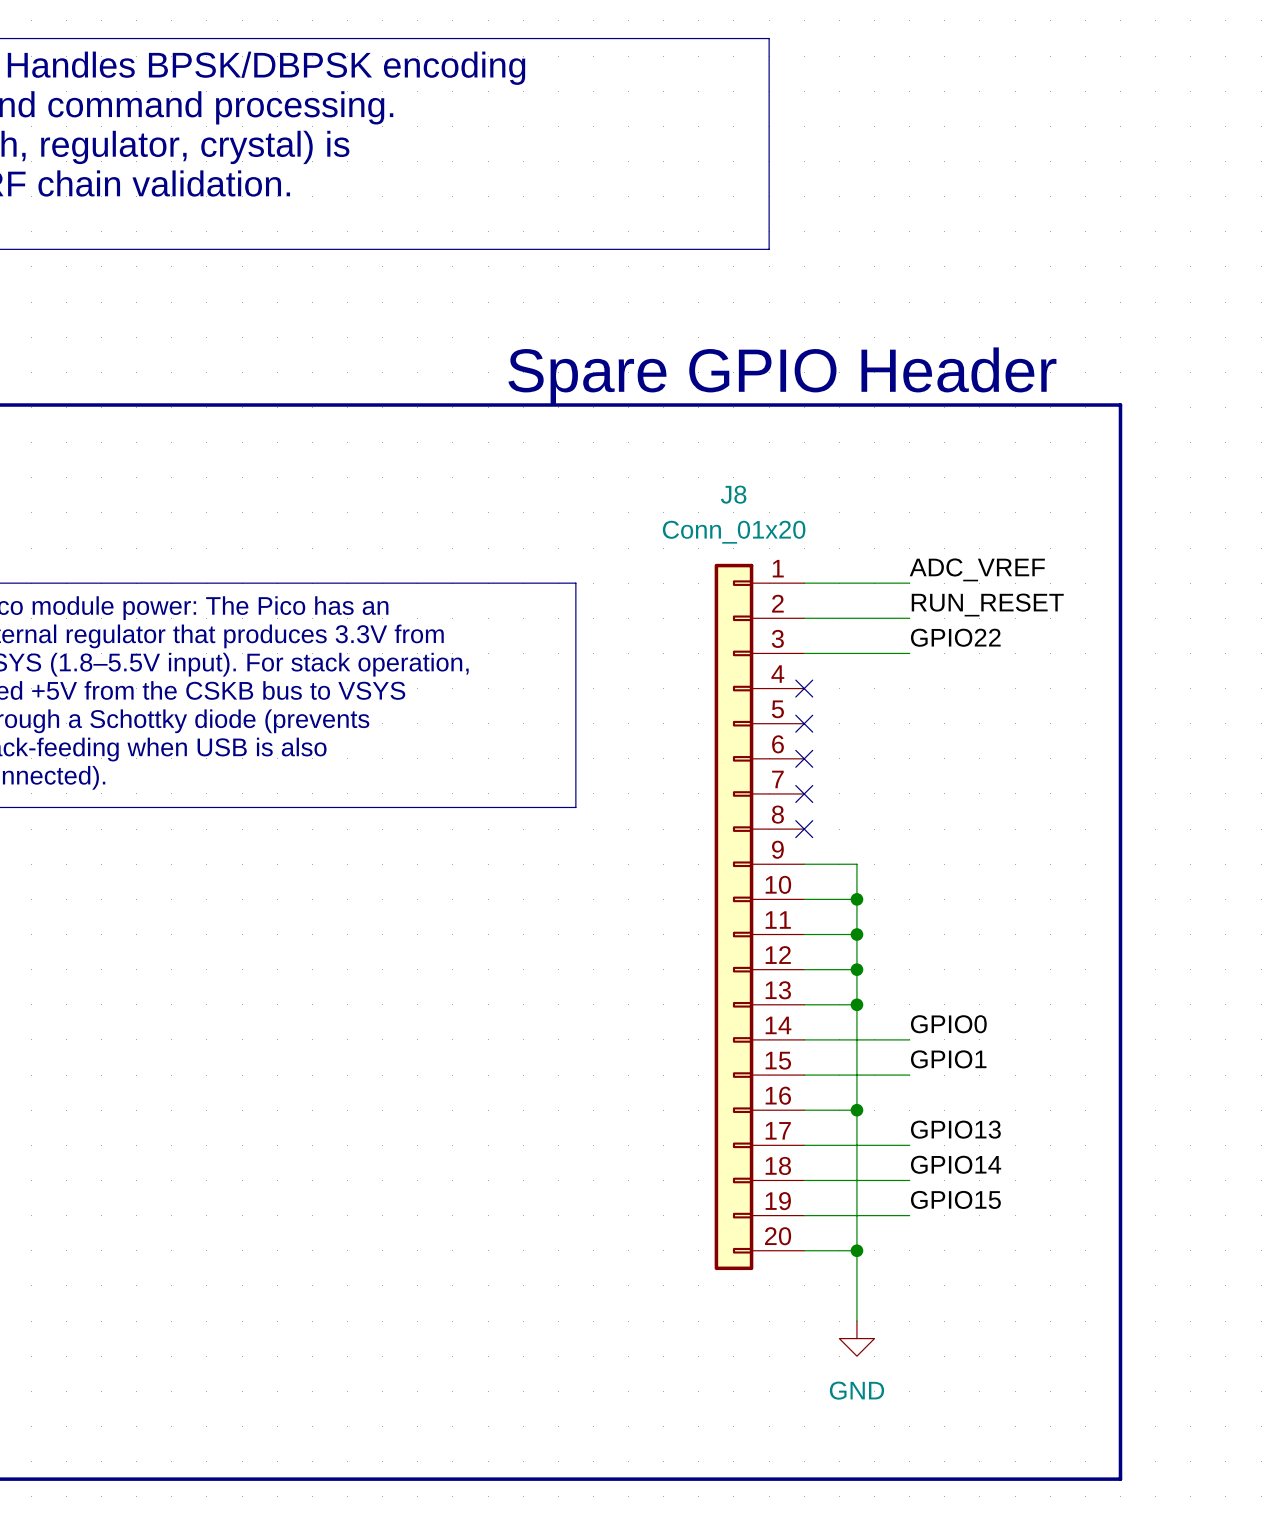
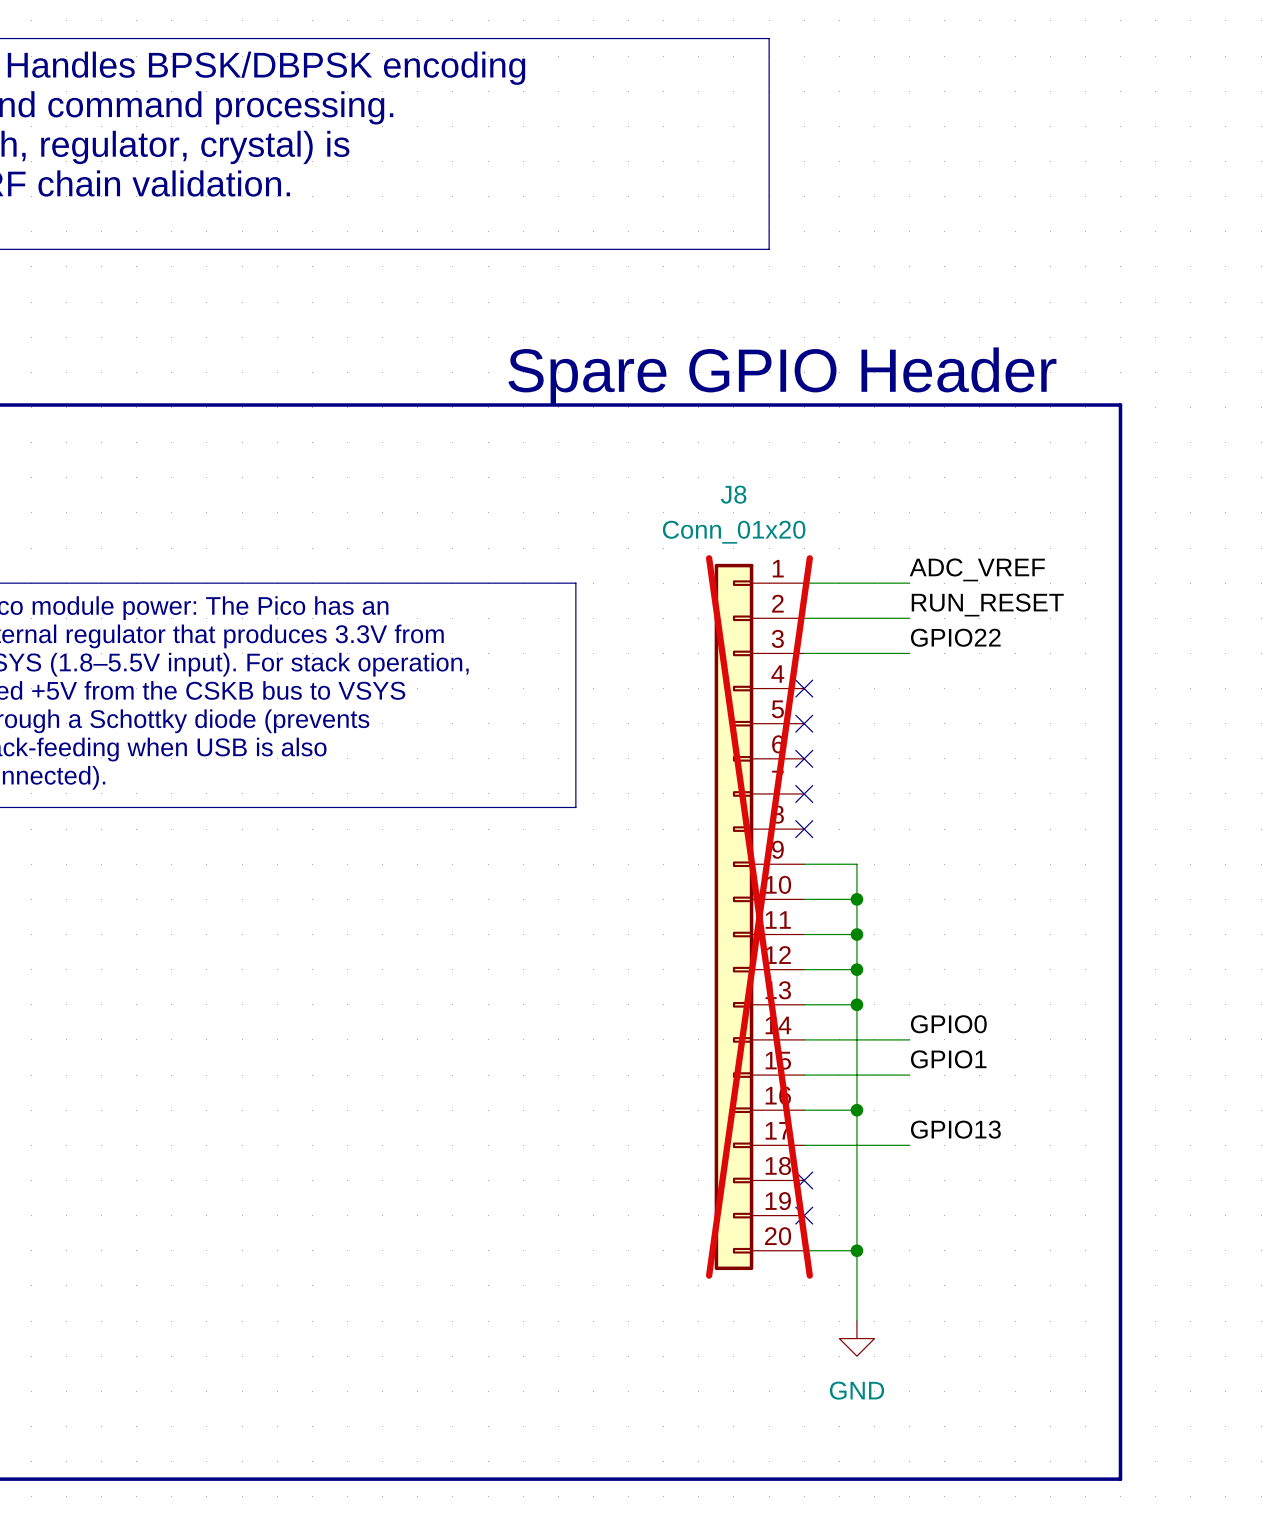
J8 do-not-place cross: none -> (759, 916)
label: GPIO14 (956, 1164) -> none
wire: (804, 1180) (909, 1180) -> none
no-connect mark: none -> (804, 1180)
label: GPIO15 (955, 1199) -> none
wire: (804, 1215) (909, 1215) -> none
no-connect mark: none -> (804, 1215)

